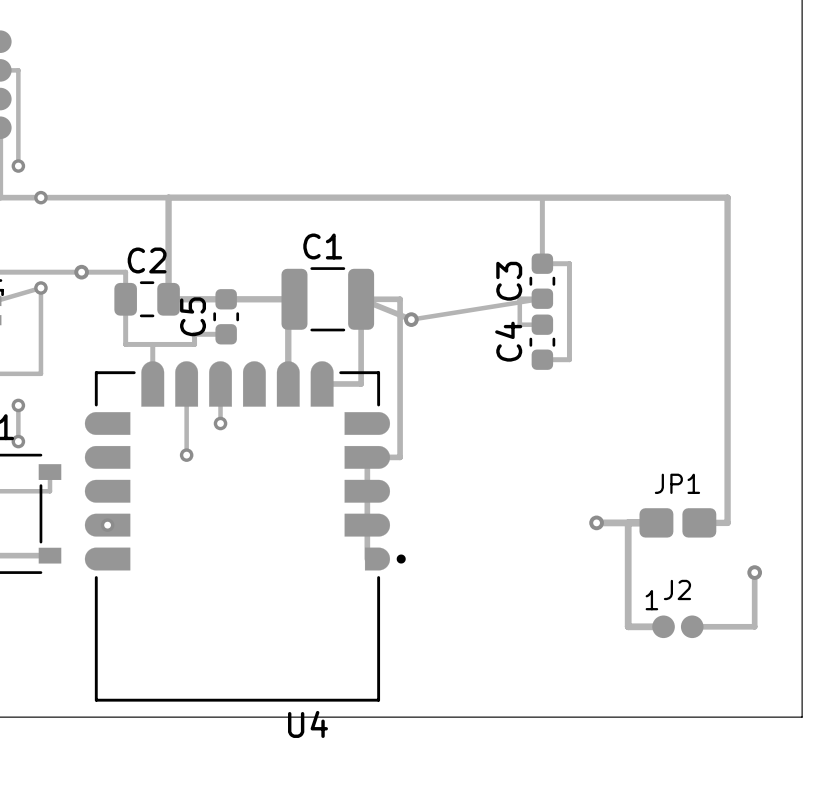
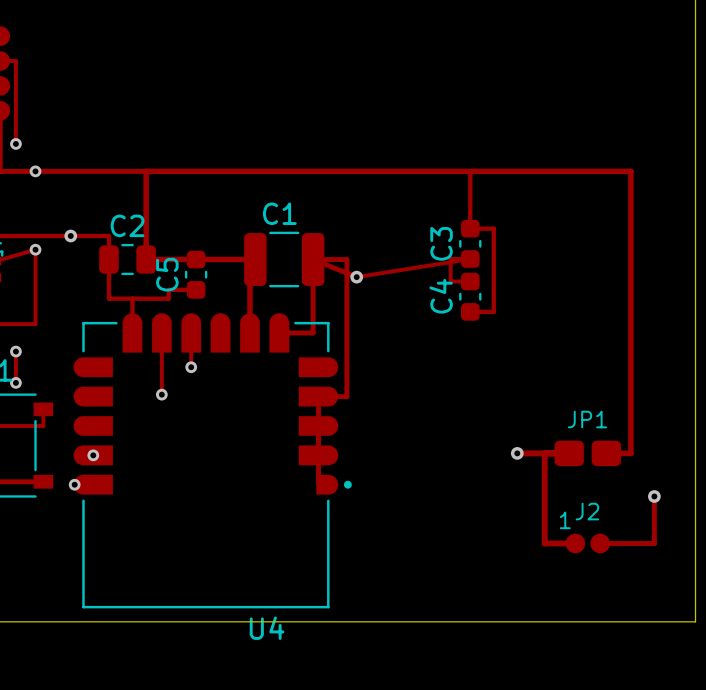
via: none -> (74, 484)

